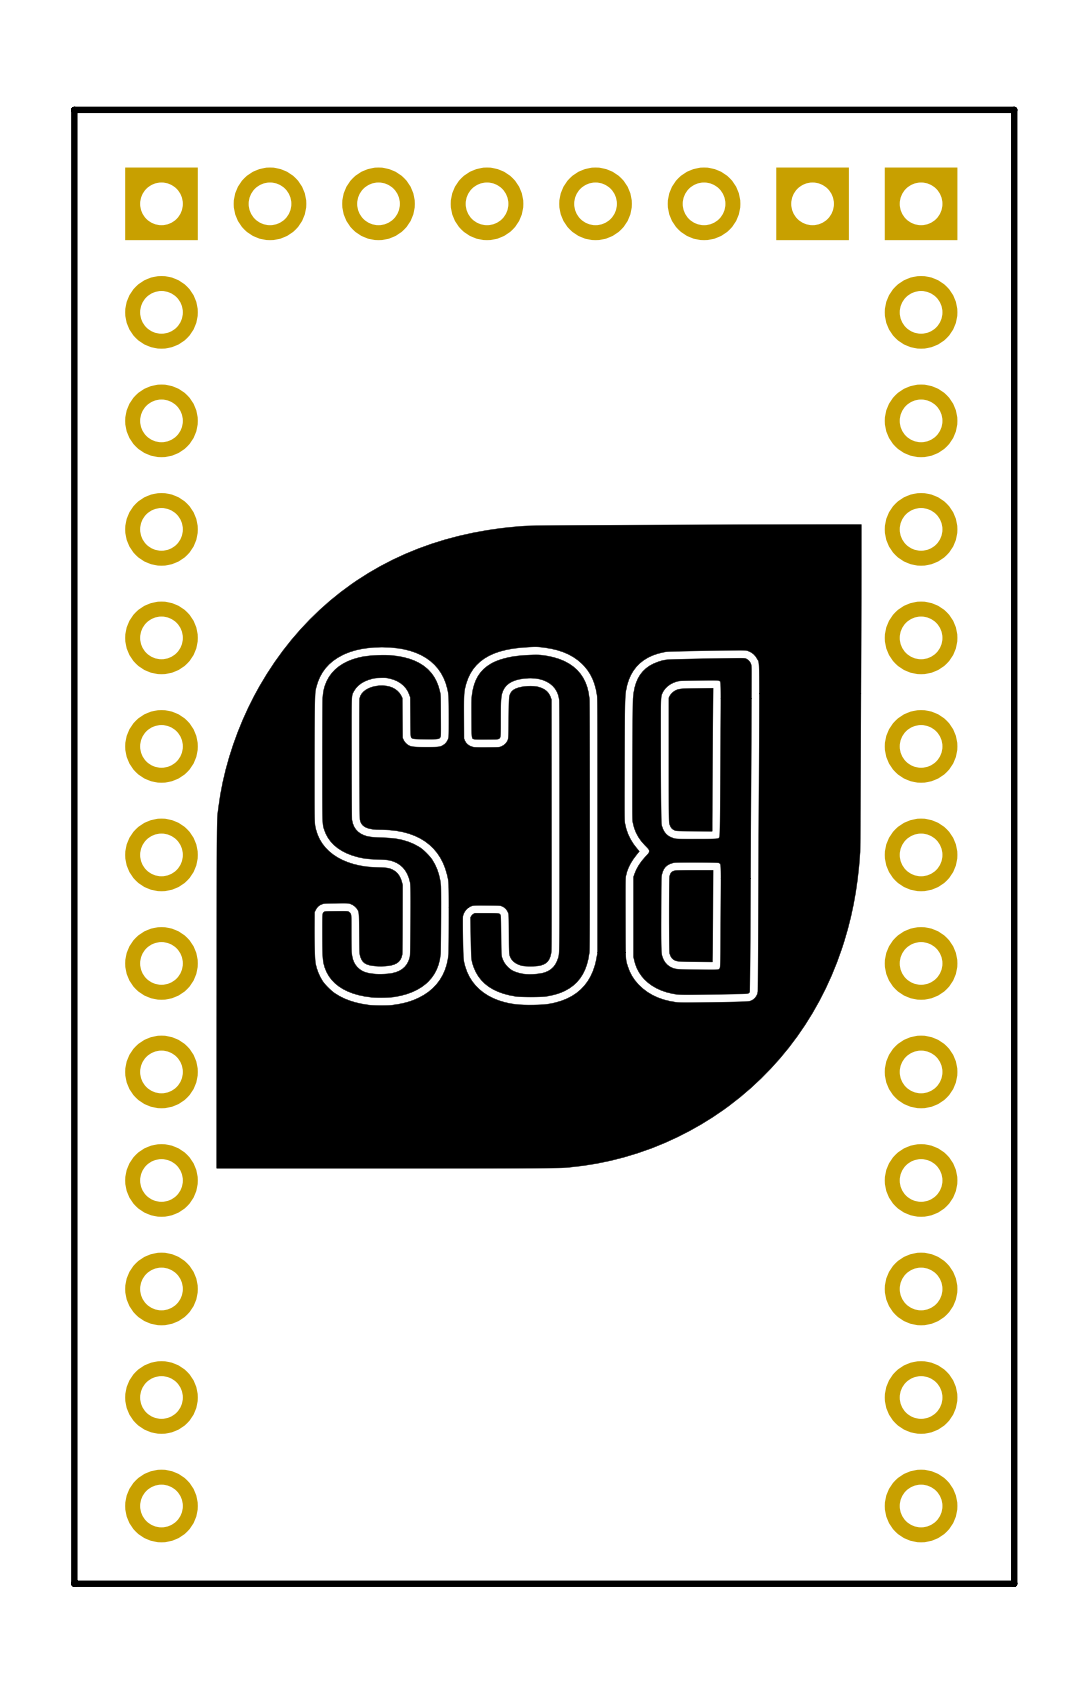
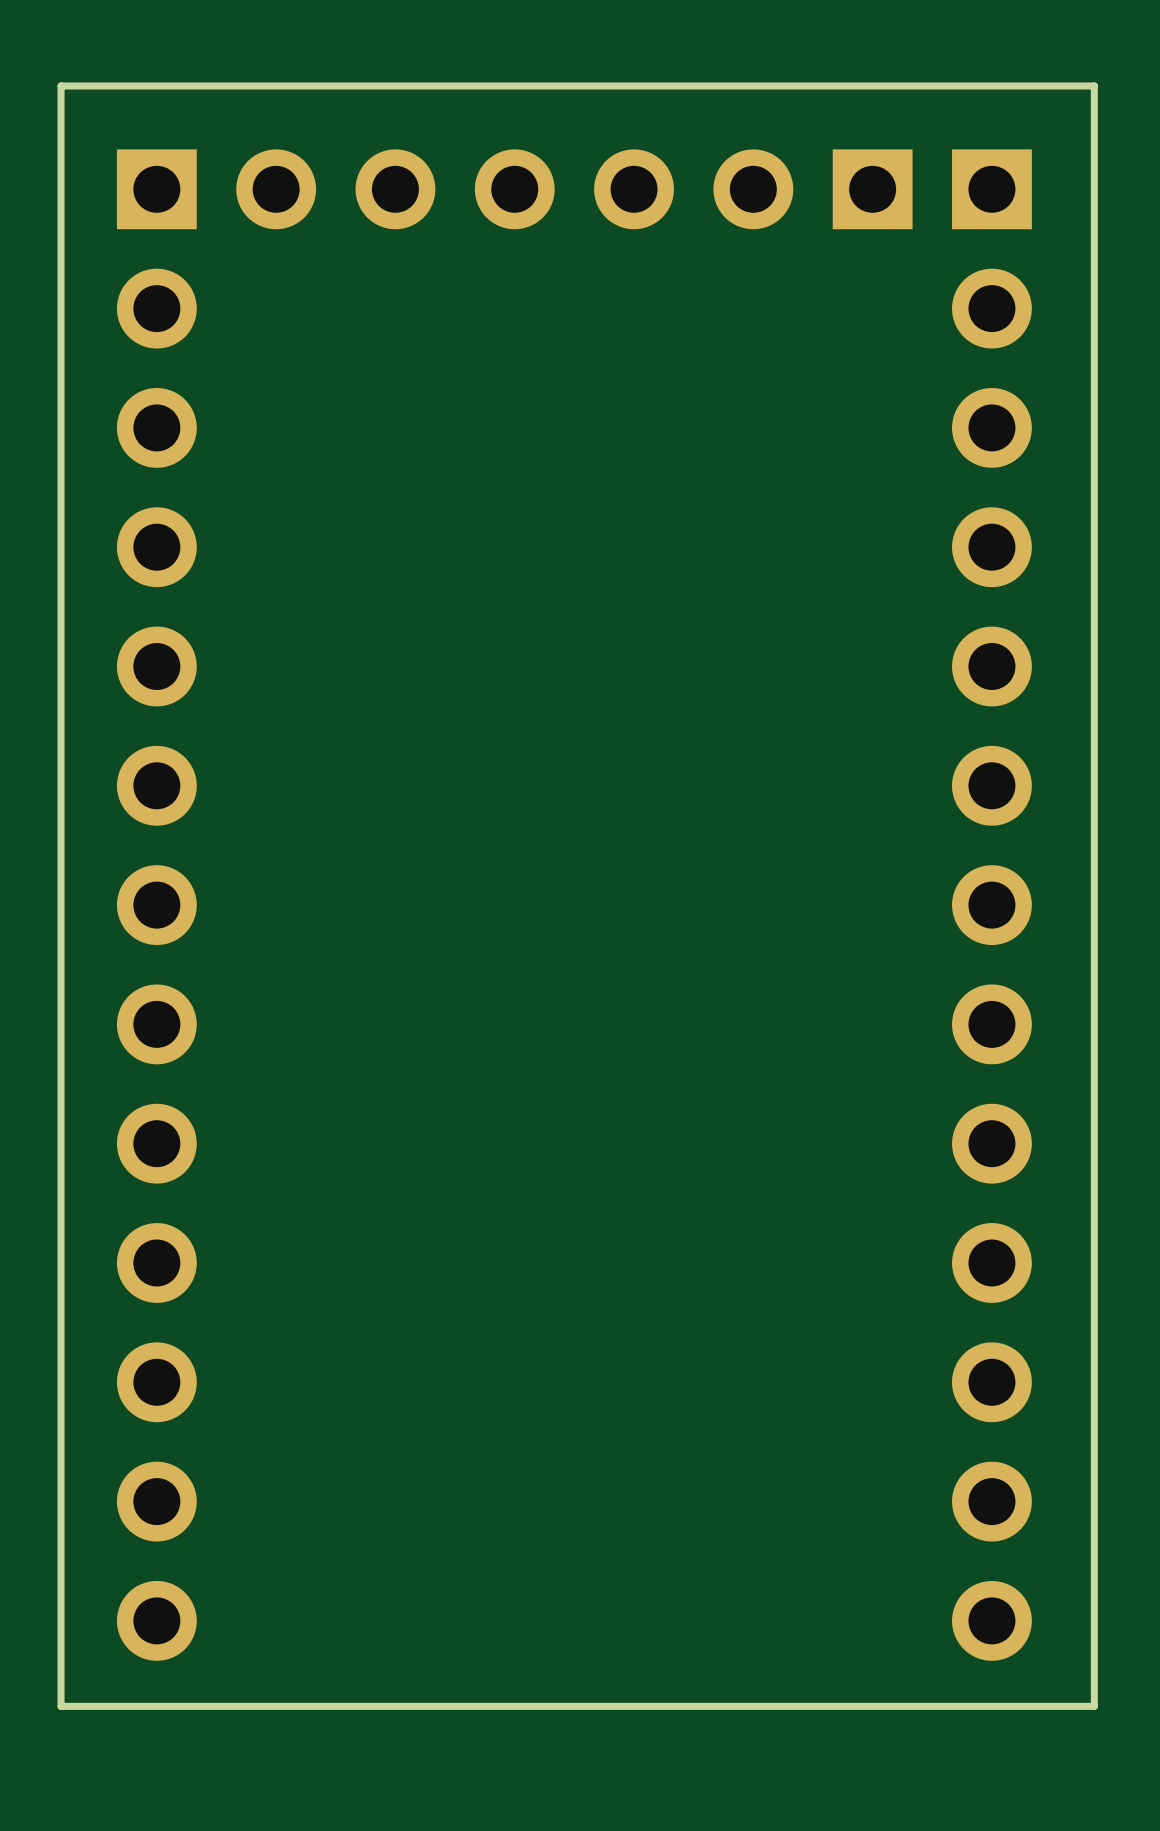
drawing: [216, 524, 862, 1169] -> none

